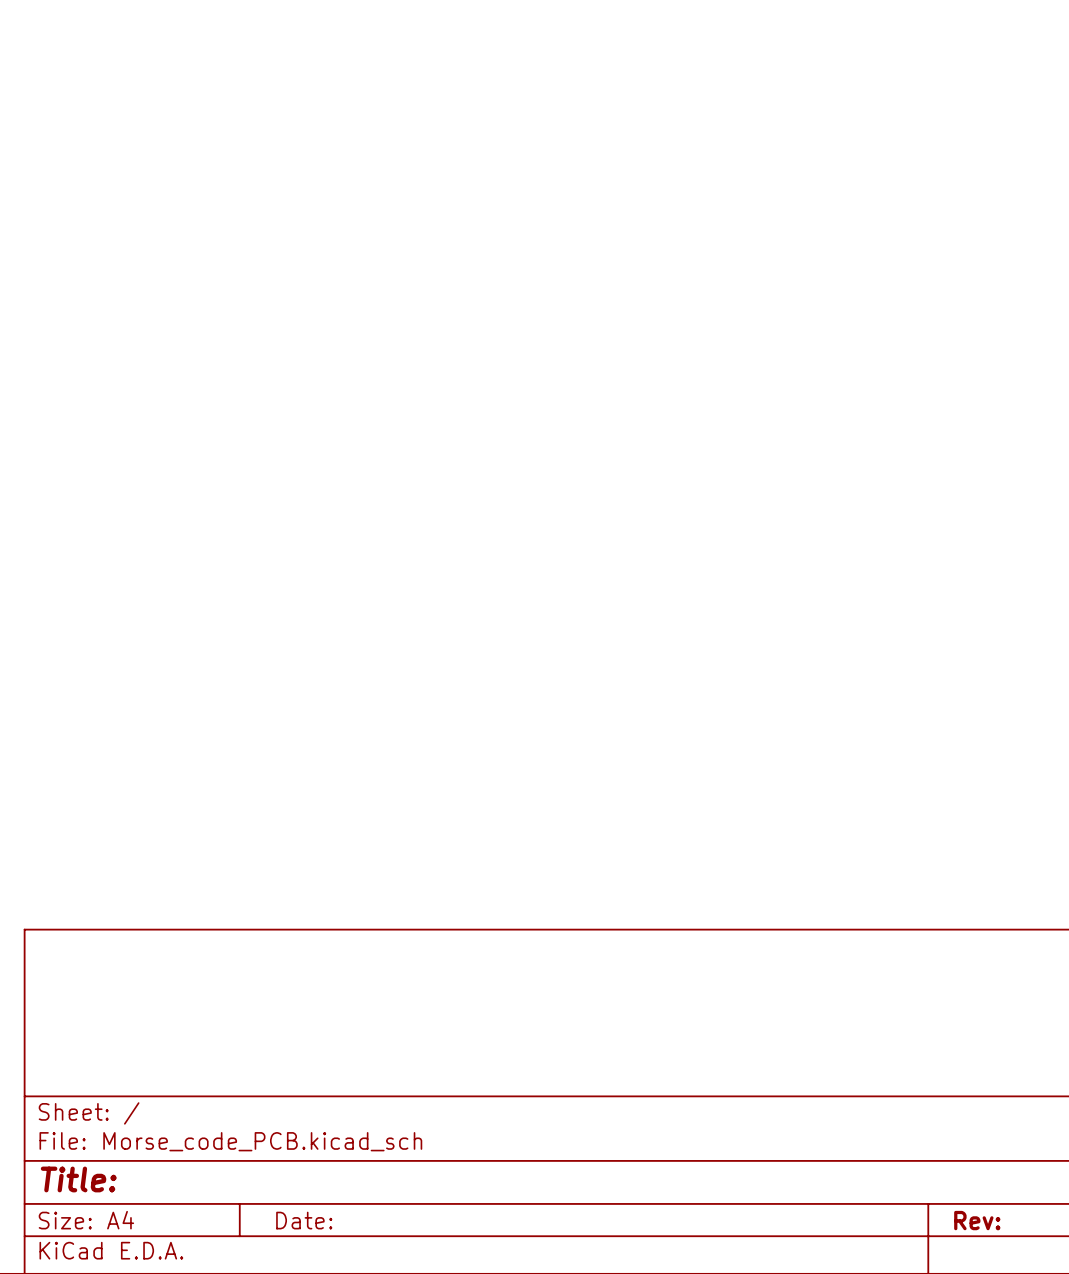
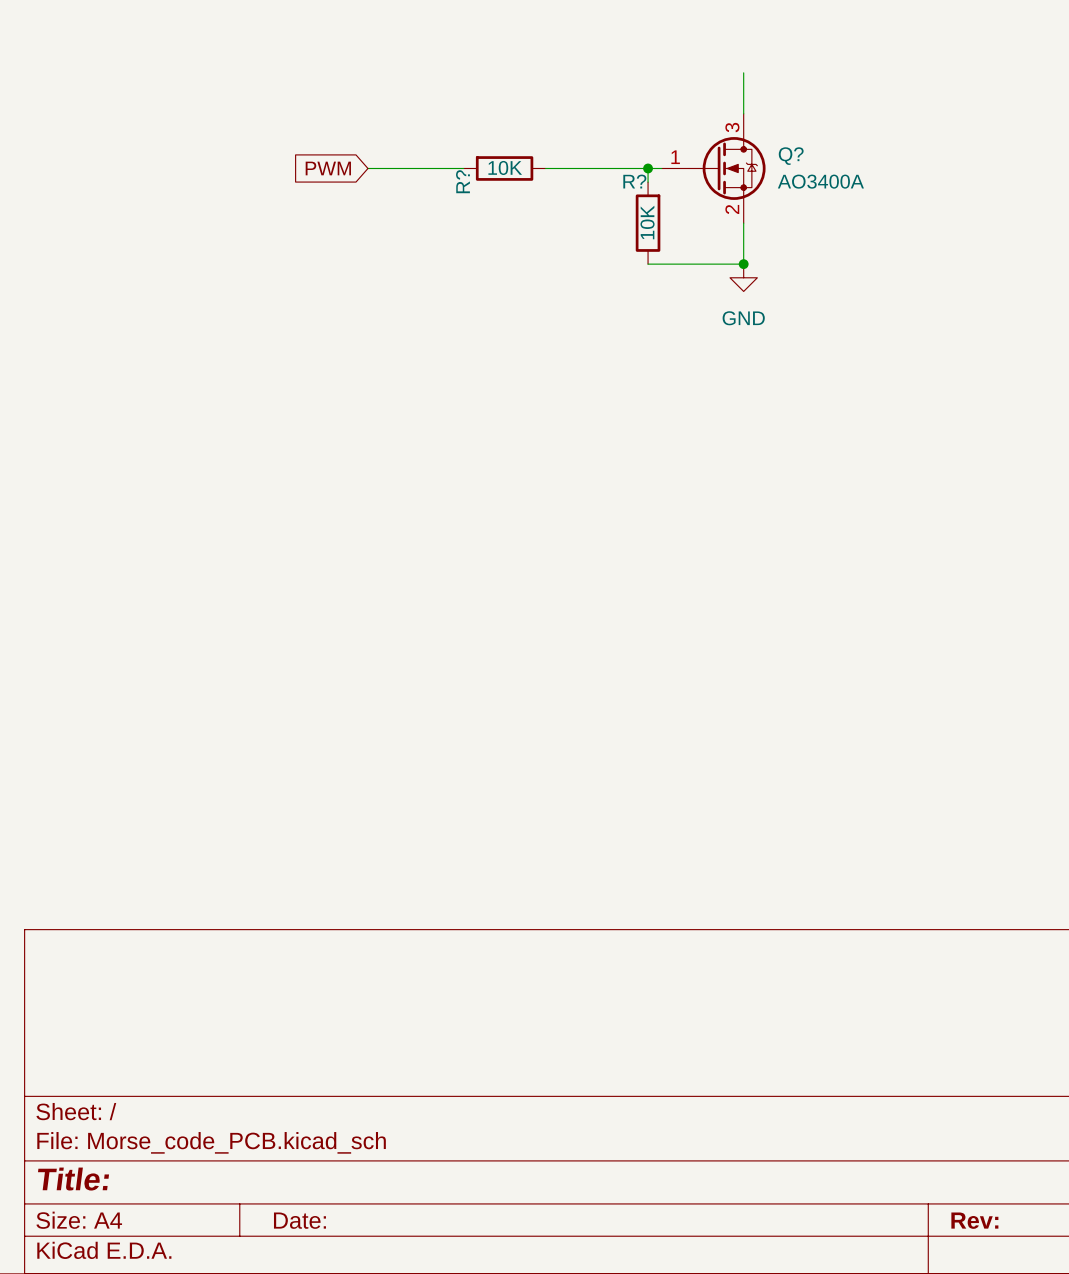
wire: none -> (743, 72) (743, 113)
global label: none -> PWM (328, 168)
wire: none -> (367, 168) (463, 168)
R?: none -> 10K (504, 168)
wire: none -> (545, 168) (661, 168)
wire: none -> (648, 168) (648, 182)
junction: none -> (648, 168)
Q?: none -> AO3400A (713, 168)
R?: none -> 10K (648, 223)
wire: none -> (743, 223) (743, 264) (648, 264)
junction: none -> (743, 264)
power symbol: none -> GND (743, 277)

